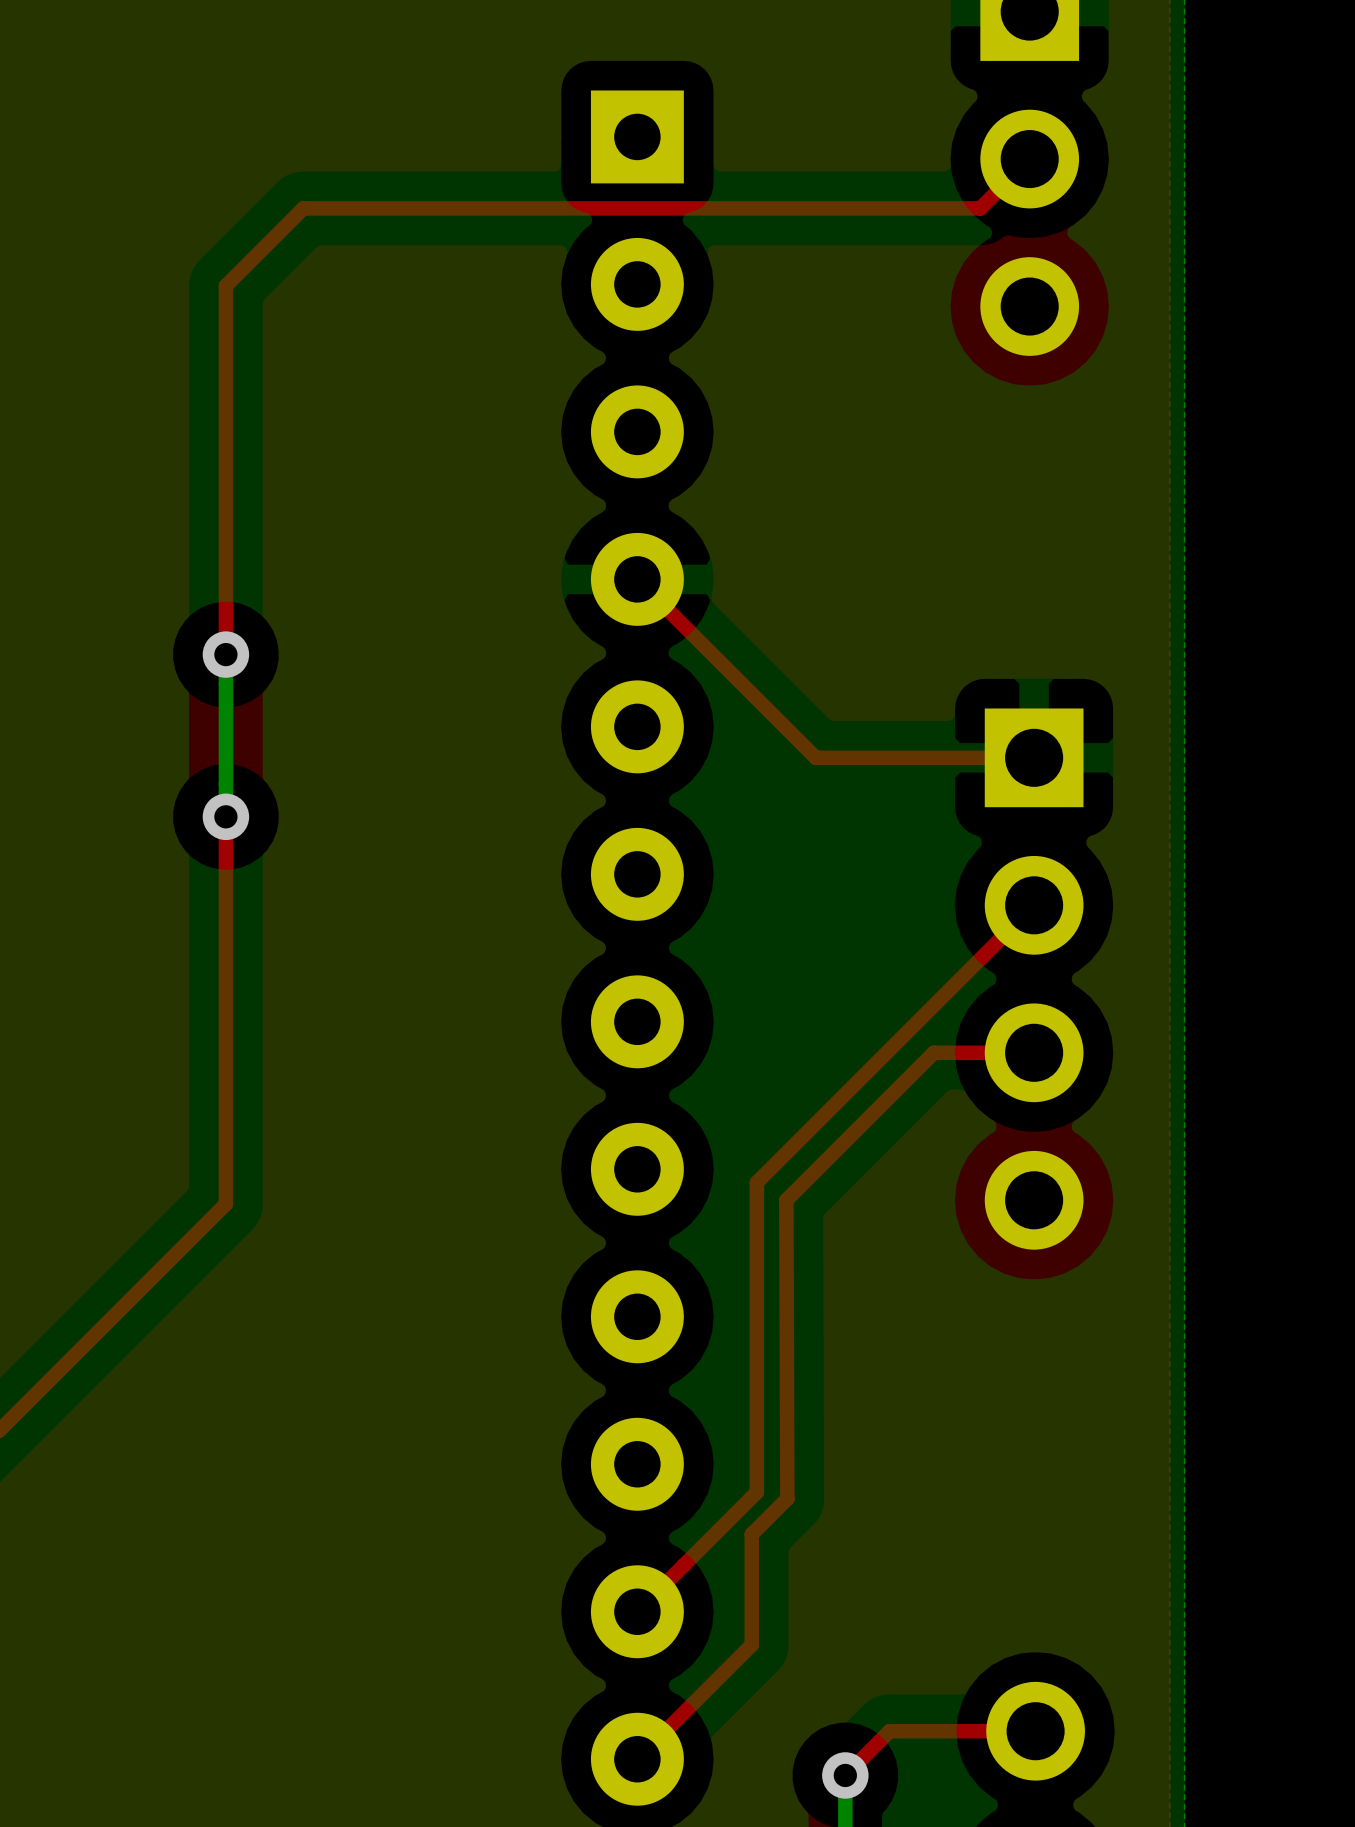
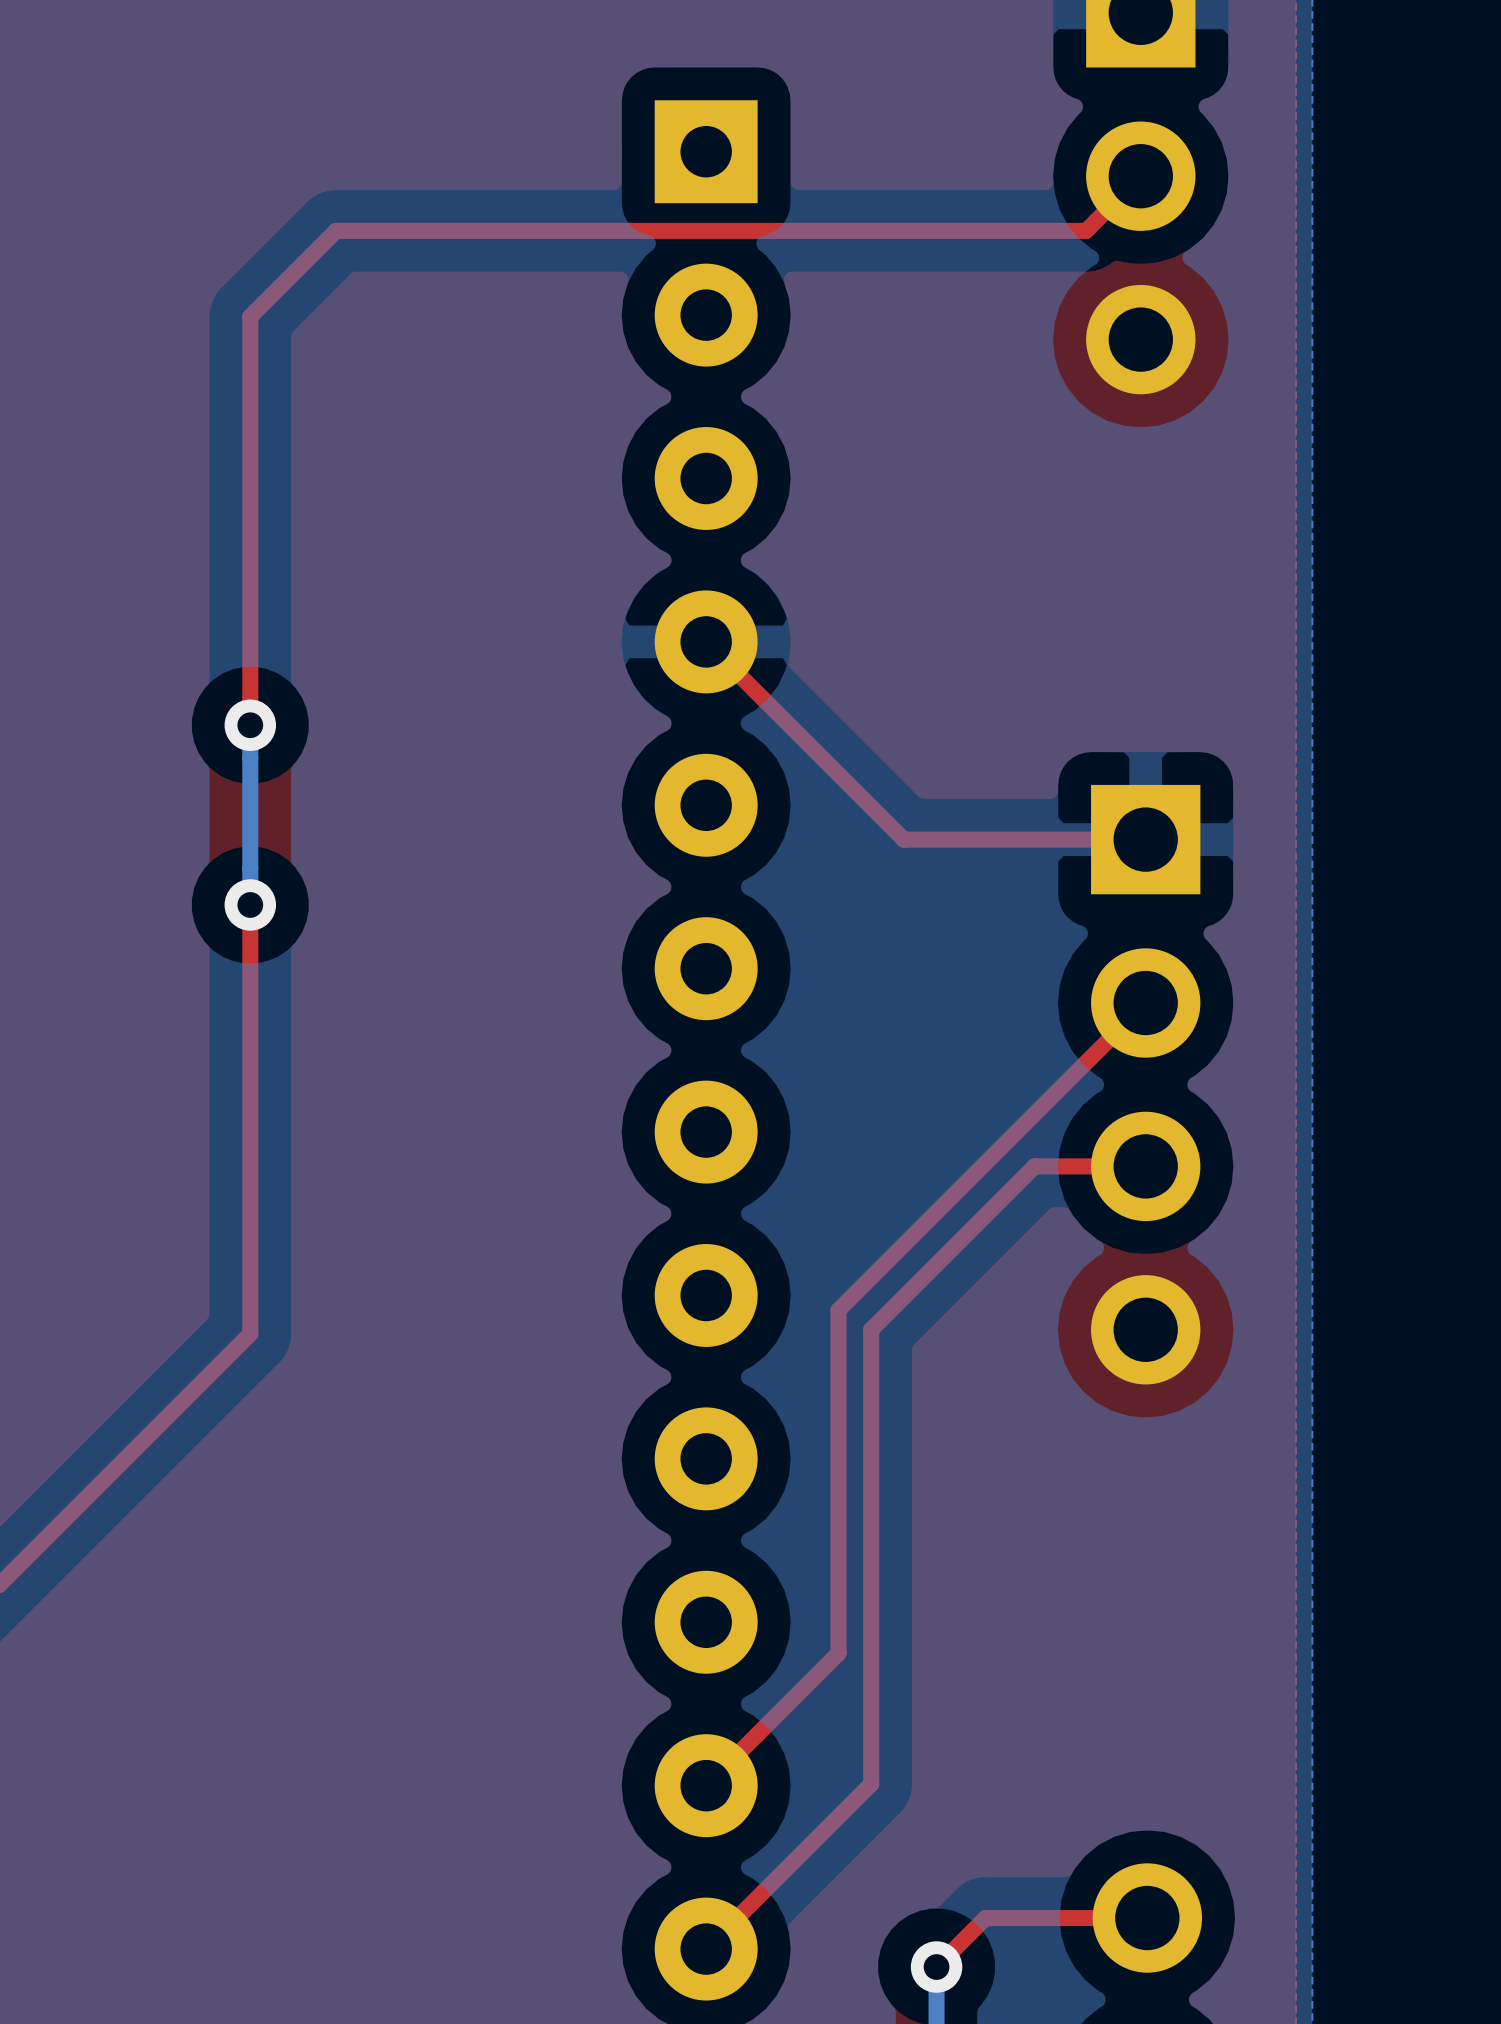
top track: (786, 1200) (787, 1498) (751, 1534) (751, 1644) -> (871, 1329) (871, 1784) (832, 1822)

